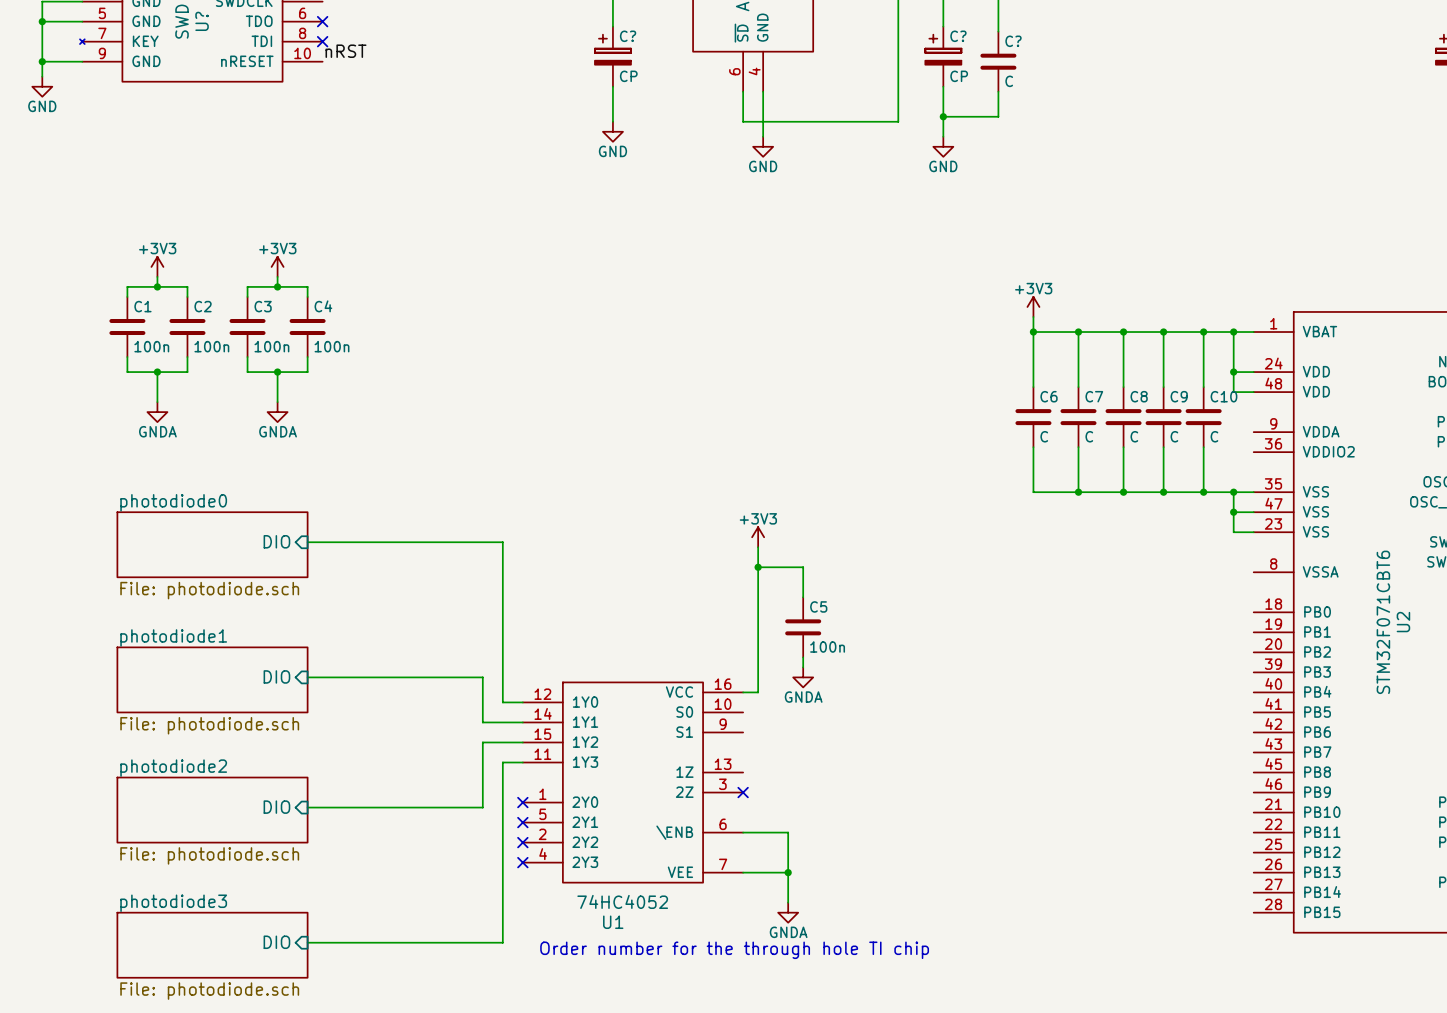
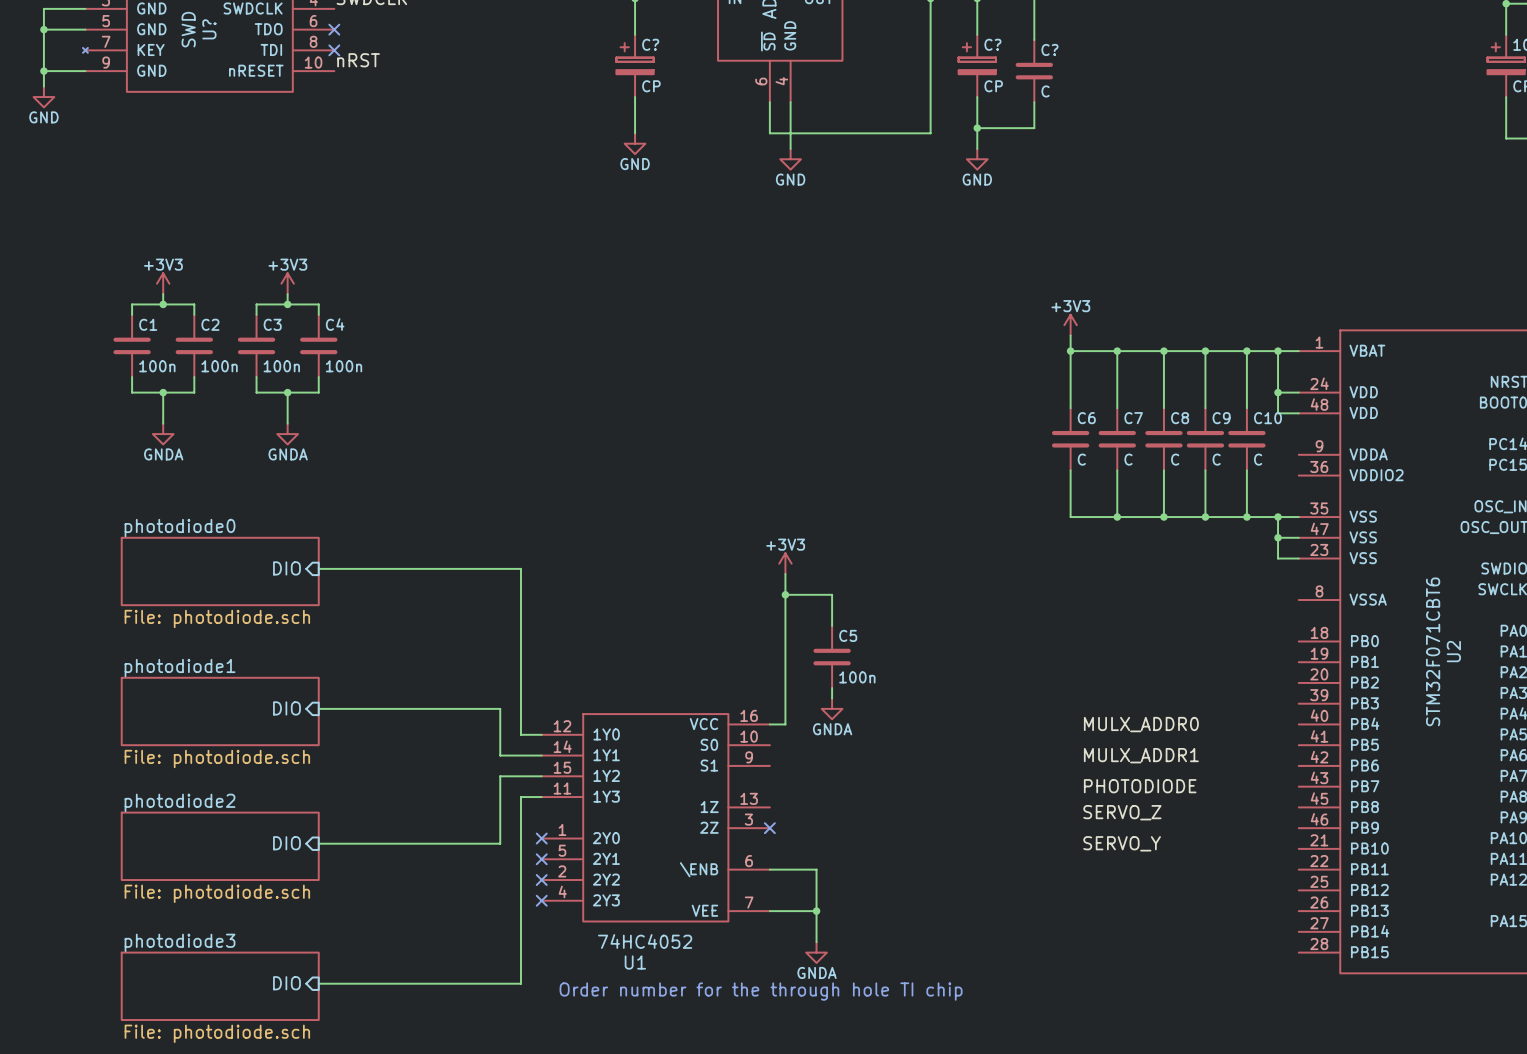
label: none -> MULX_ADDR0 (1141, 724)
label: none -> MULX_ADDR1 (1141, 755)
label: none -> PHOTODIODE (1140, 786)
label: none -> SERVO_Z (1122, 812)
label: none -> SERVO_Y (1122, 843)

